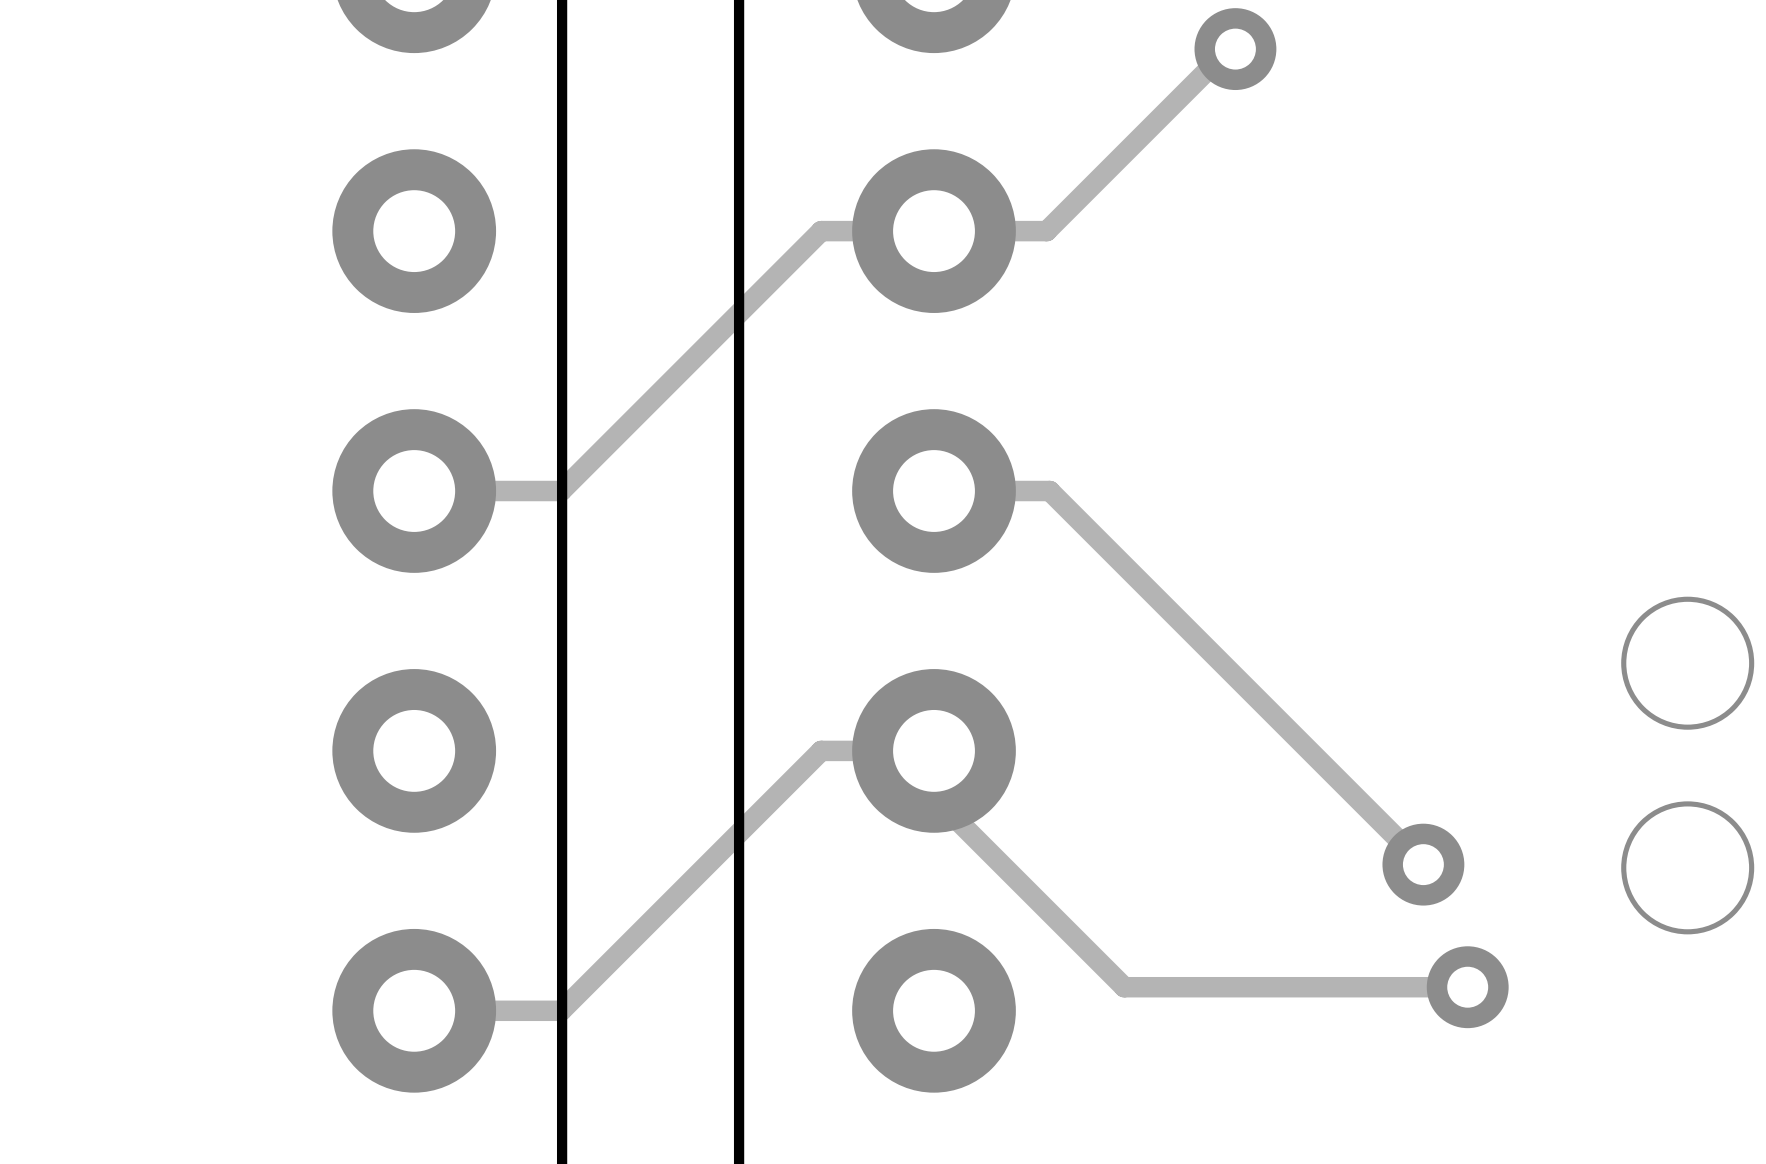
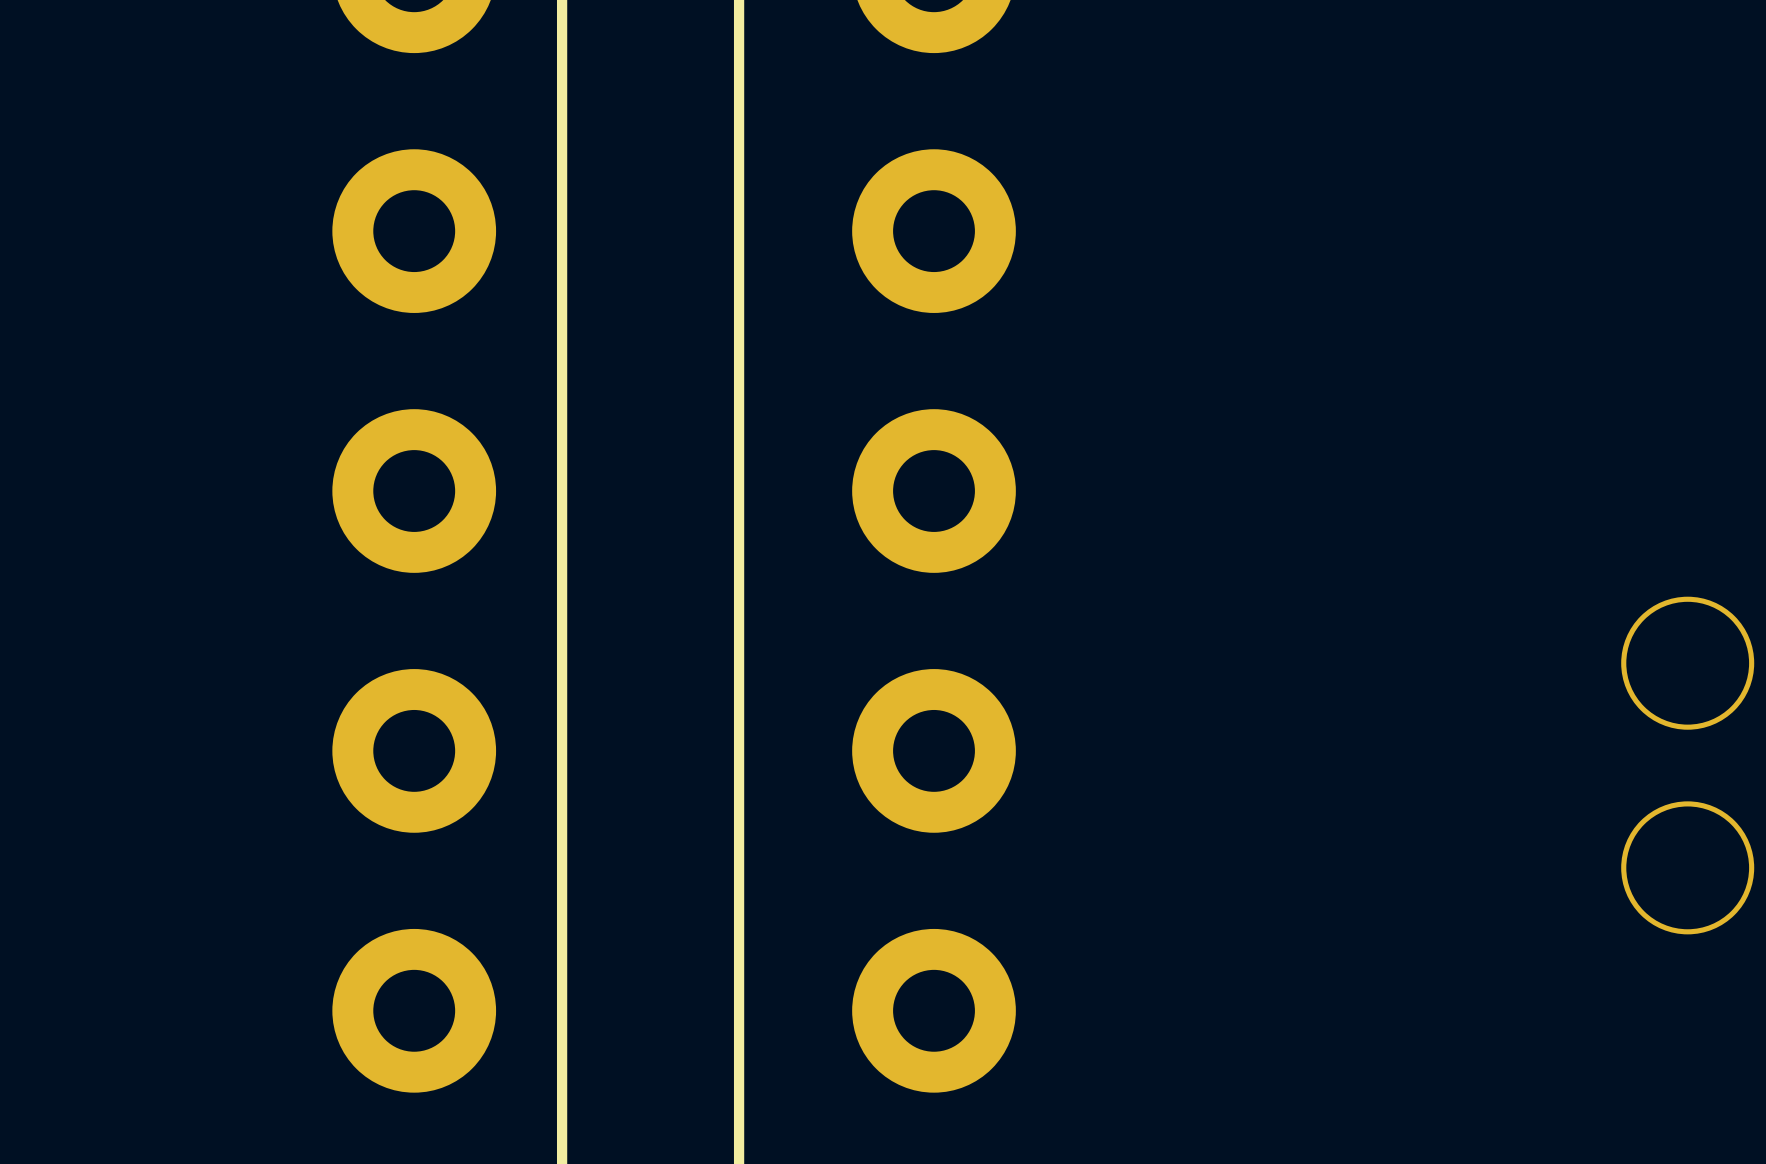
track: (1235, 49) (1228, 49) (1046, 231) (821, 231) (561, 491) (414, 491) -> none
via: (1235, 49) -> none
track: (934, 491) (1049, 491) (1423, 864) -> none
track: (887, 750) (1124, 987) (1467, 987) -> none
track: (934, 750) (821, 750) (561, 1010) (414, 1010) -> none
via: (1423, 864) -> none
via: (1467, 987) -> none

